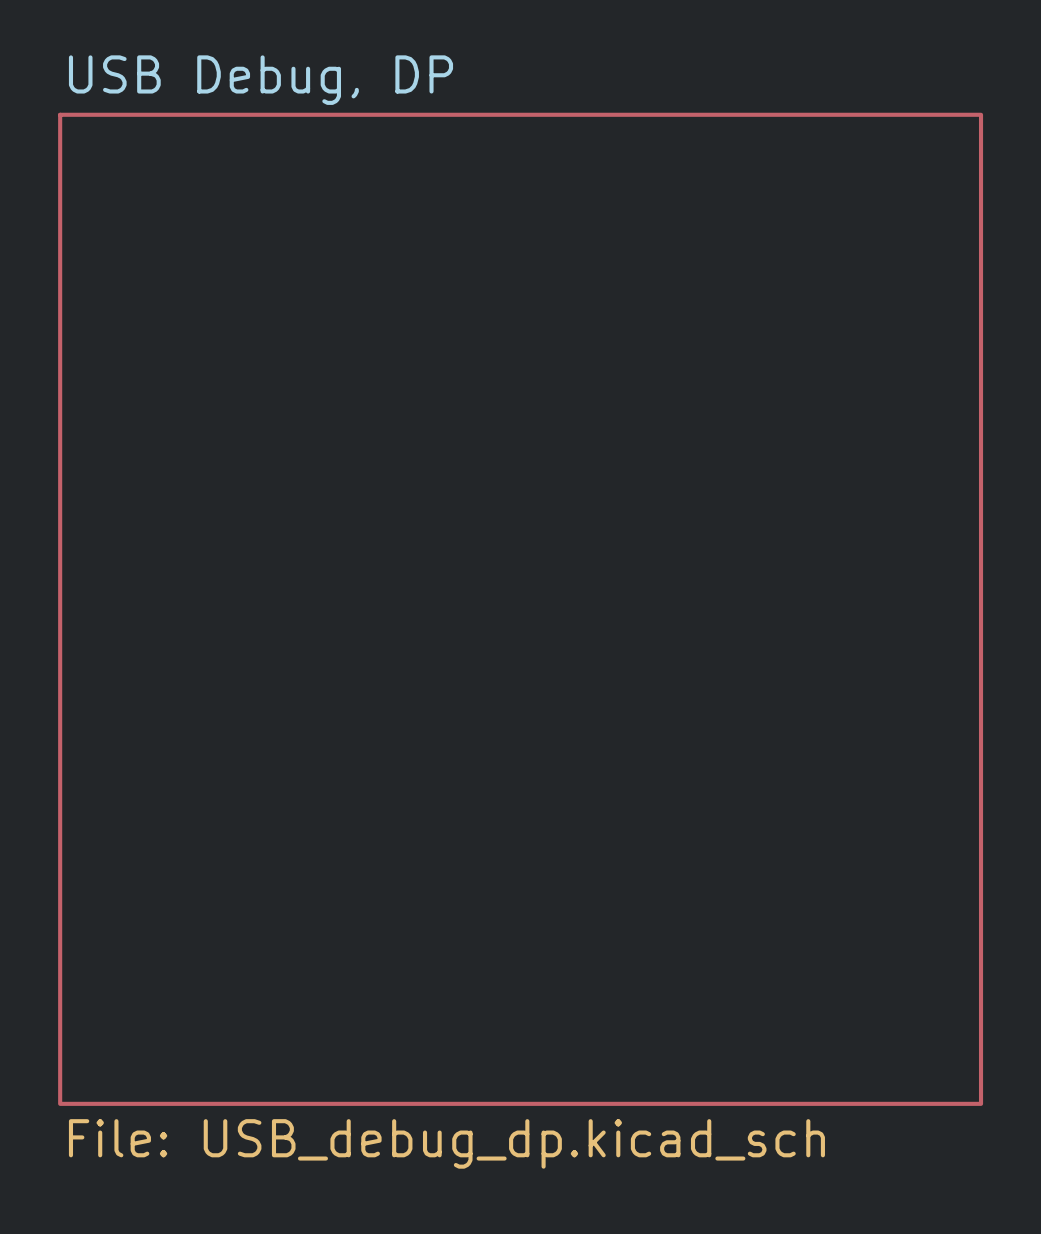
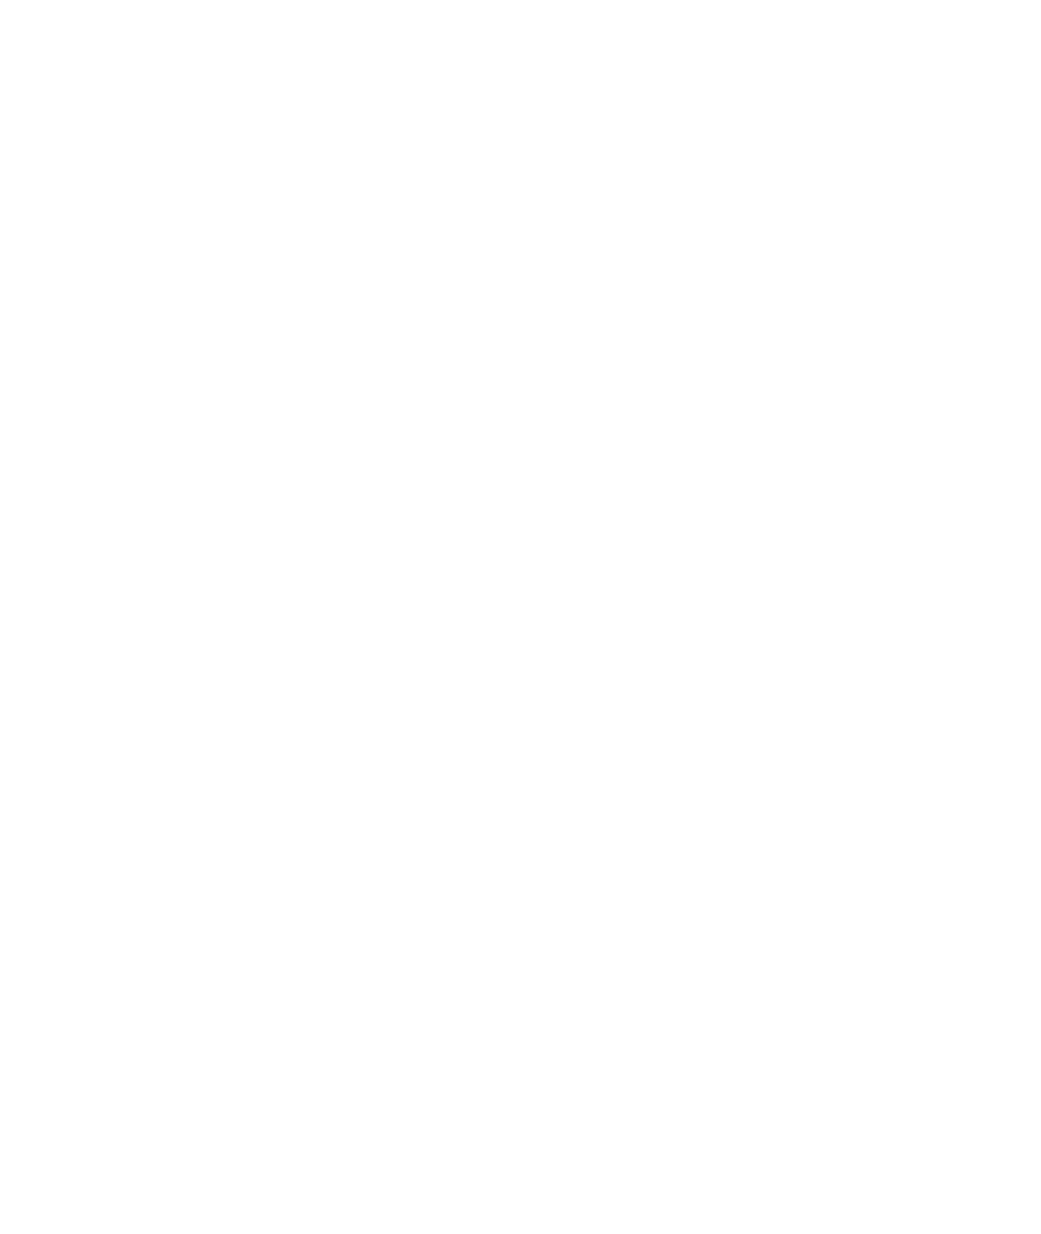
sheet USB Debug, DP: File: USB_debug_dp.kicad_sch (520, 609) -> none

